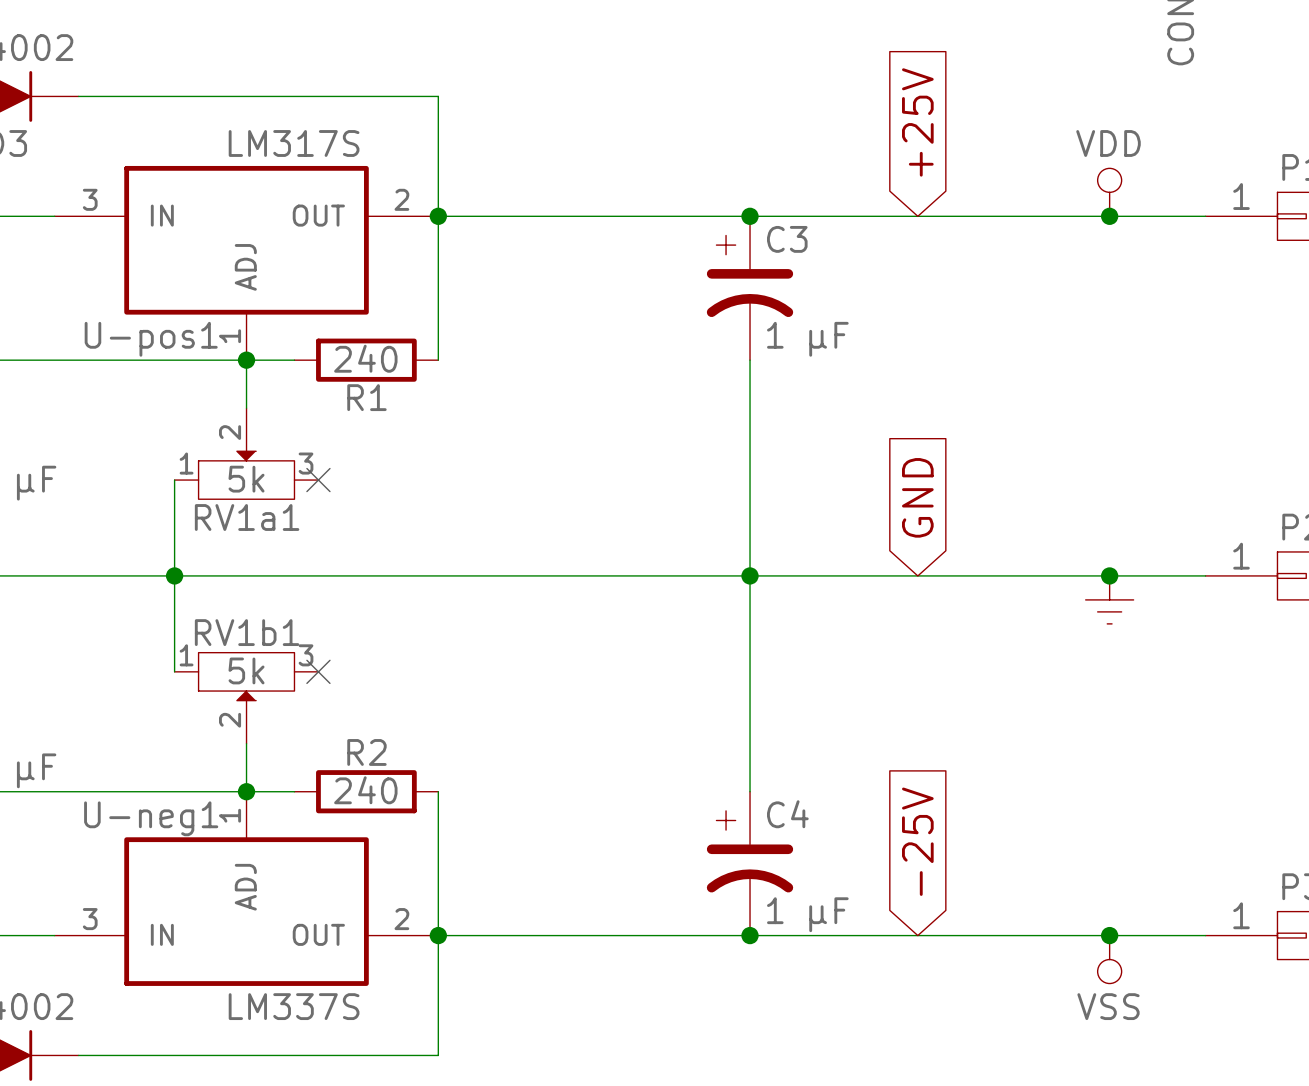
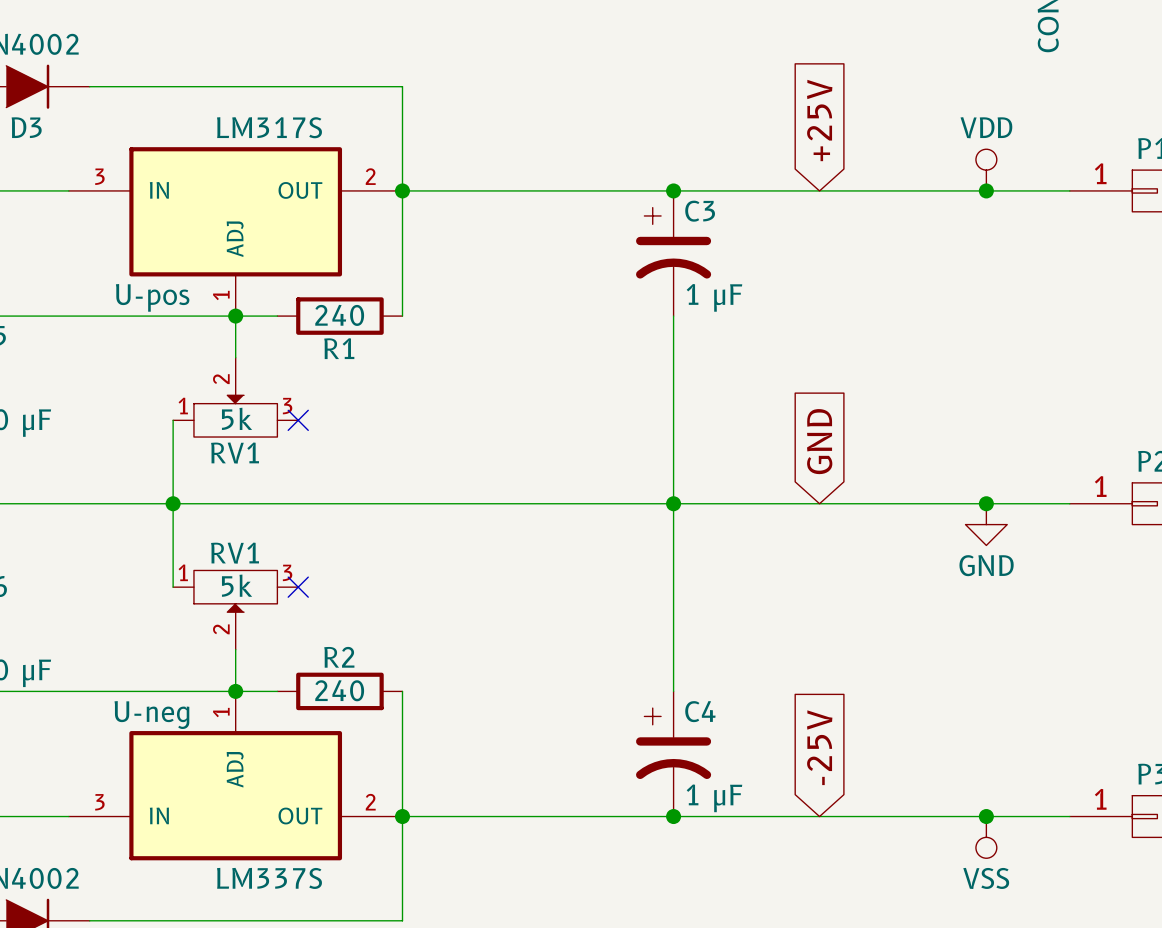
U-pos1 name: U-pos1 (151, 339) -> U-pos (152, 297)
RV1a1 name: RV1a1 (247, 517) -> RV1 (235, 453)
power symbol shape: [1085, 575, 1134, 624] -> [965, 503, 1008, 546]
RV1b1 name: RV1b1 (247, 632) -> RV1 (235, 553)
power symbol text: none -> GND (986, 565)
U-neg1 name: U-neg1 (151, 818) -> U-neg (151, 715)

